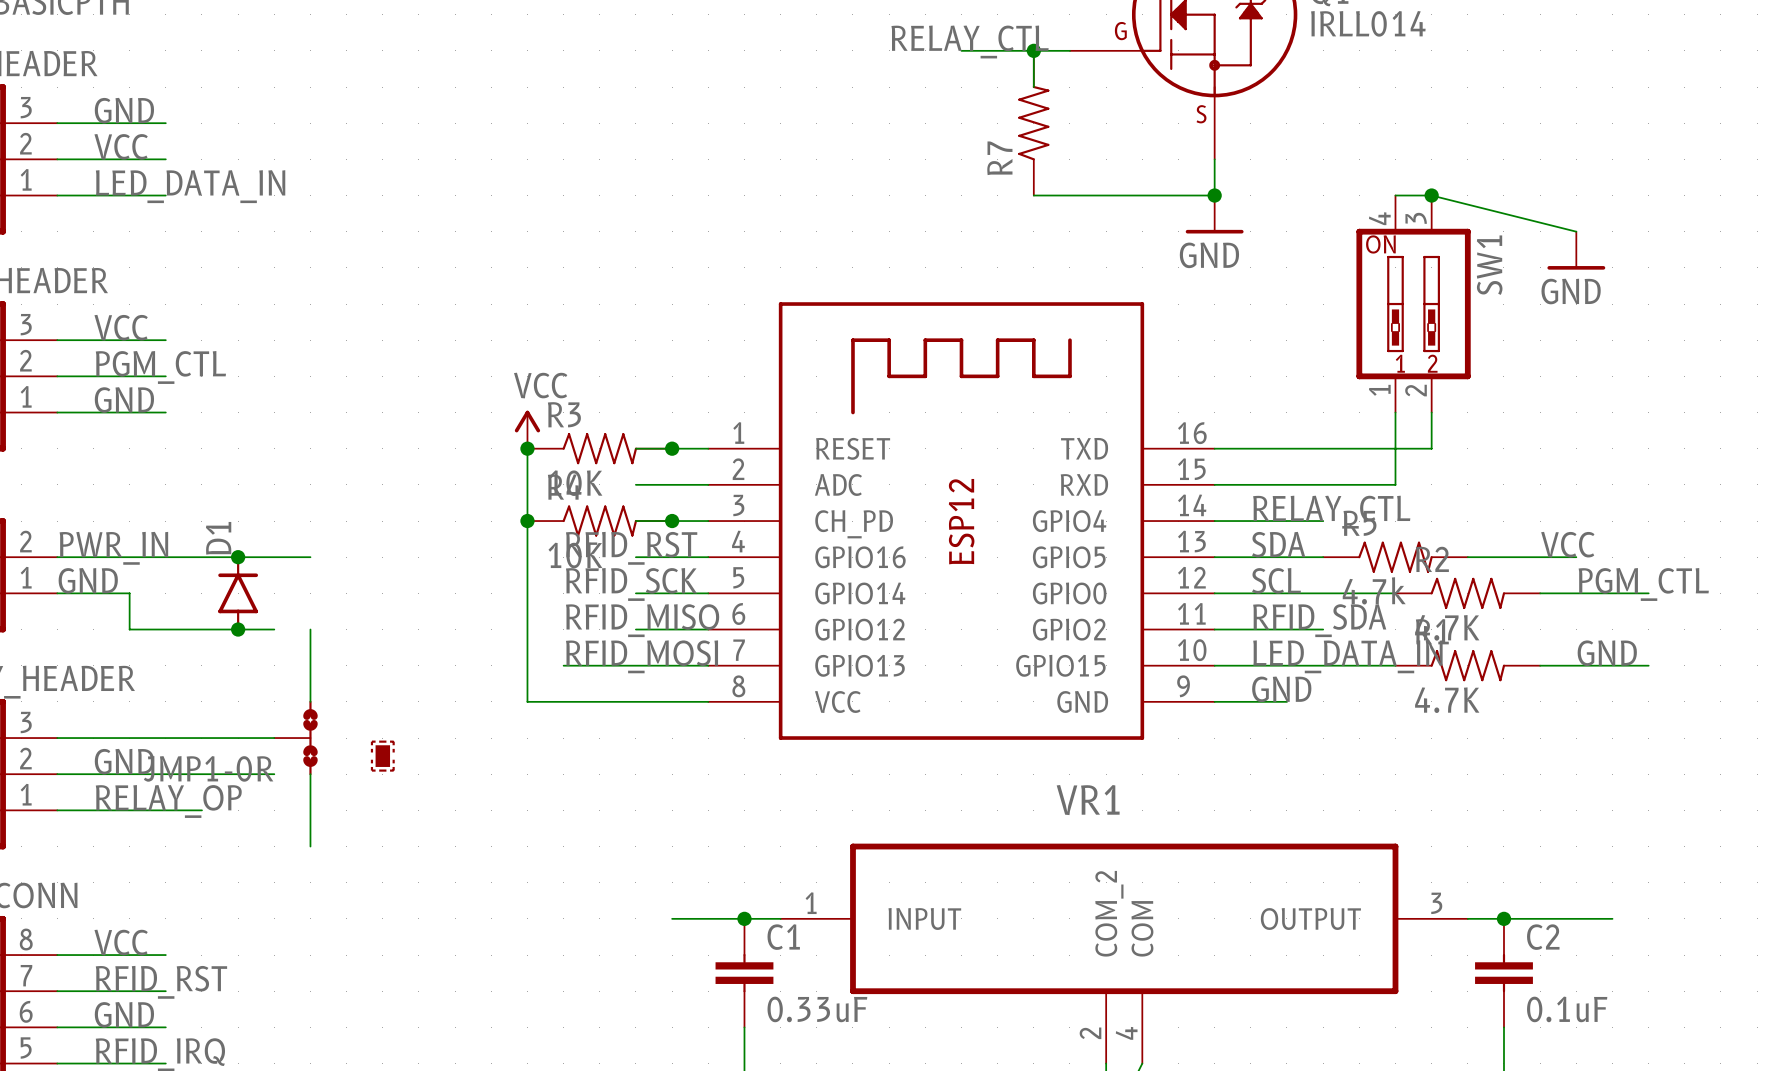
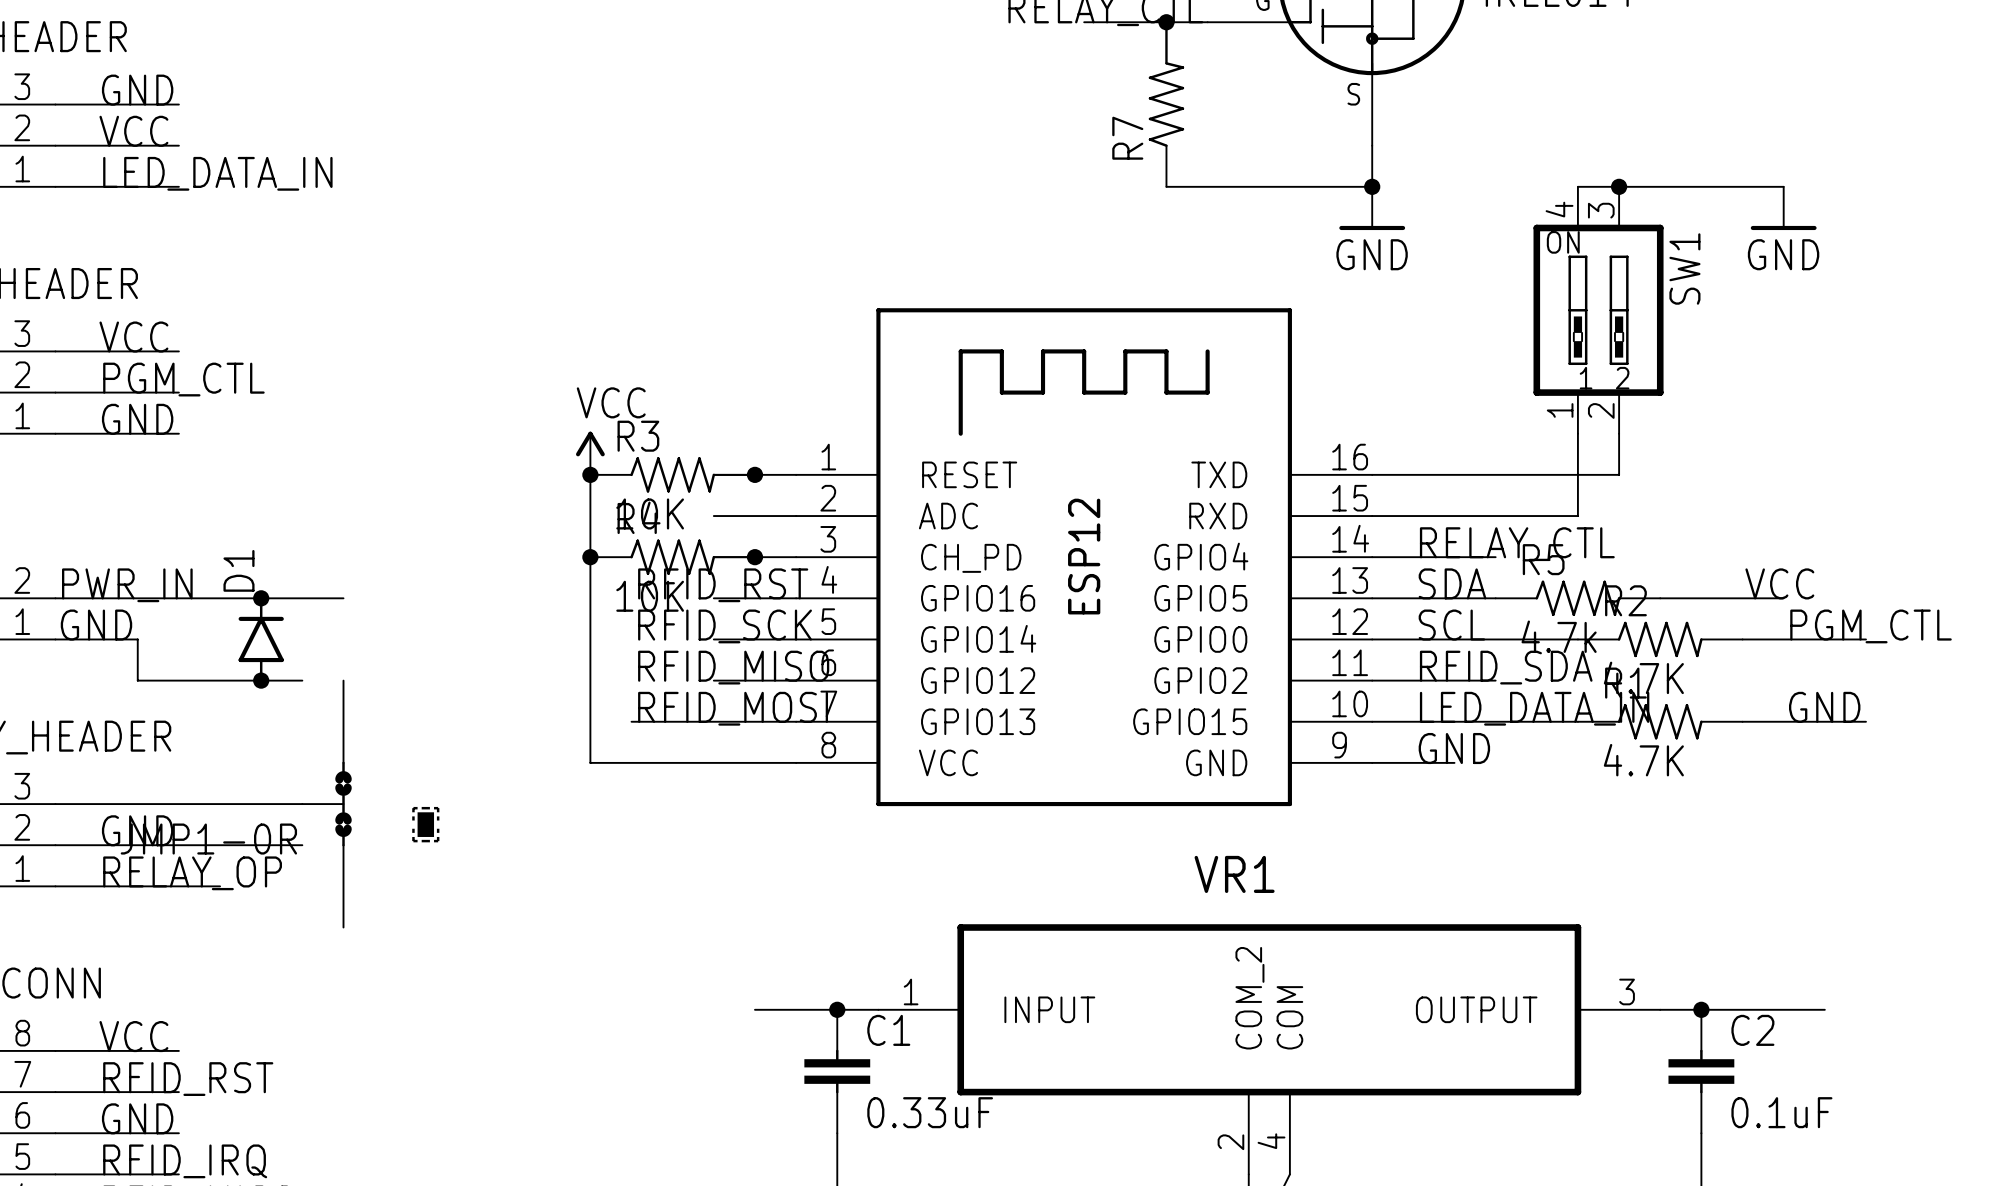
wire: (1431, 195) (1576, 231) -> (1619, 186) (1783, 186)
power symbol position: GND (1576, 250) -> GND (1783, 208)

